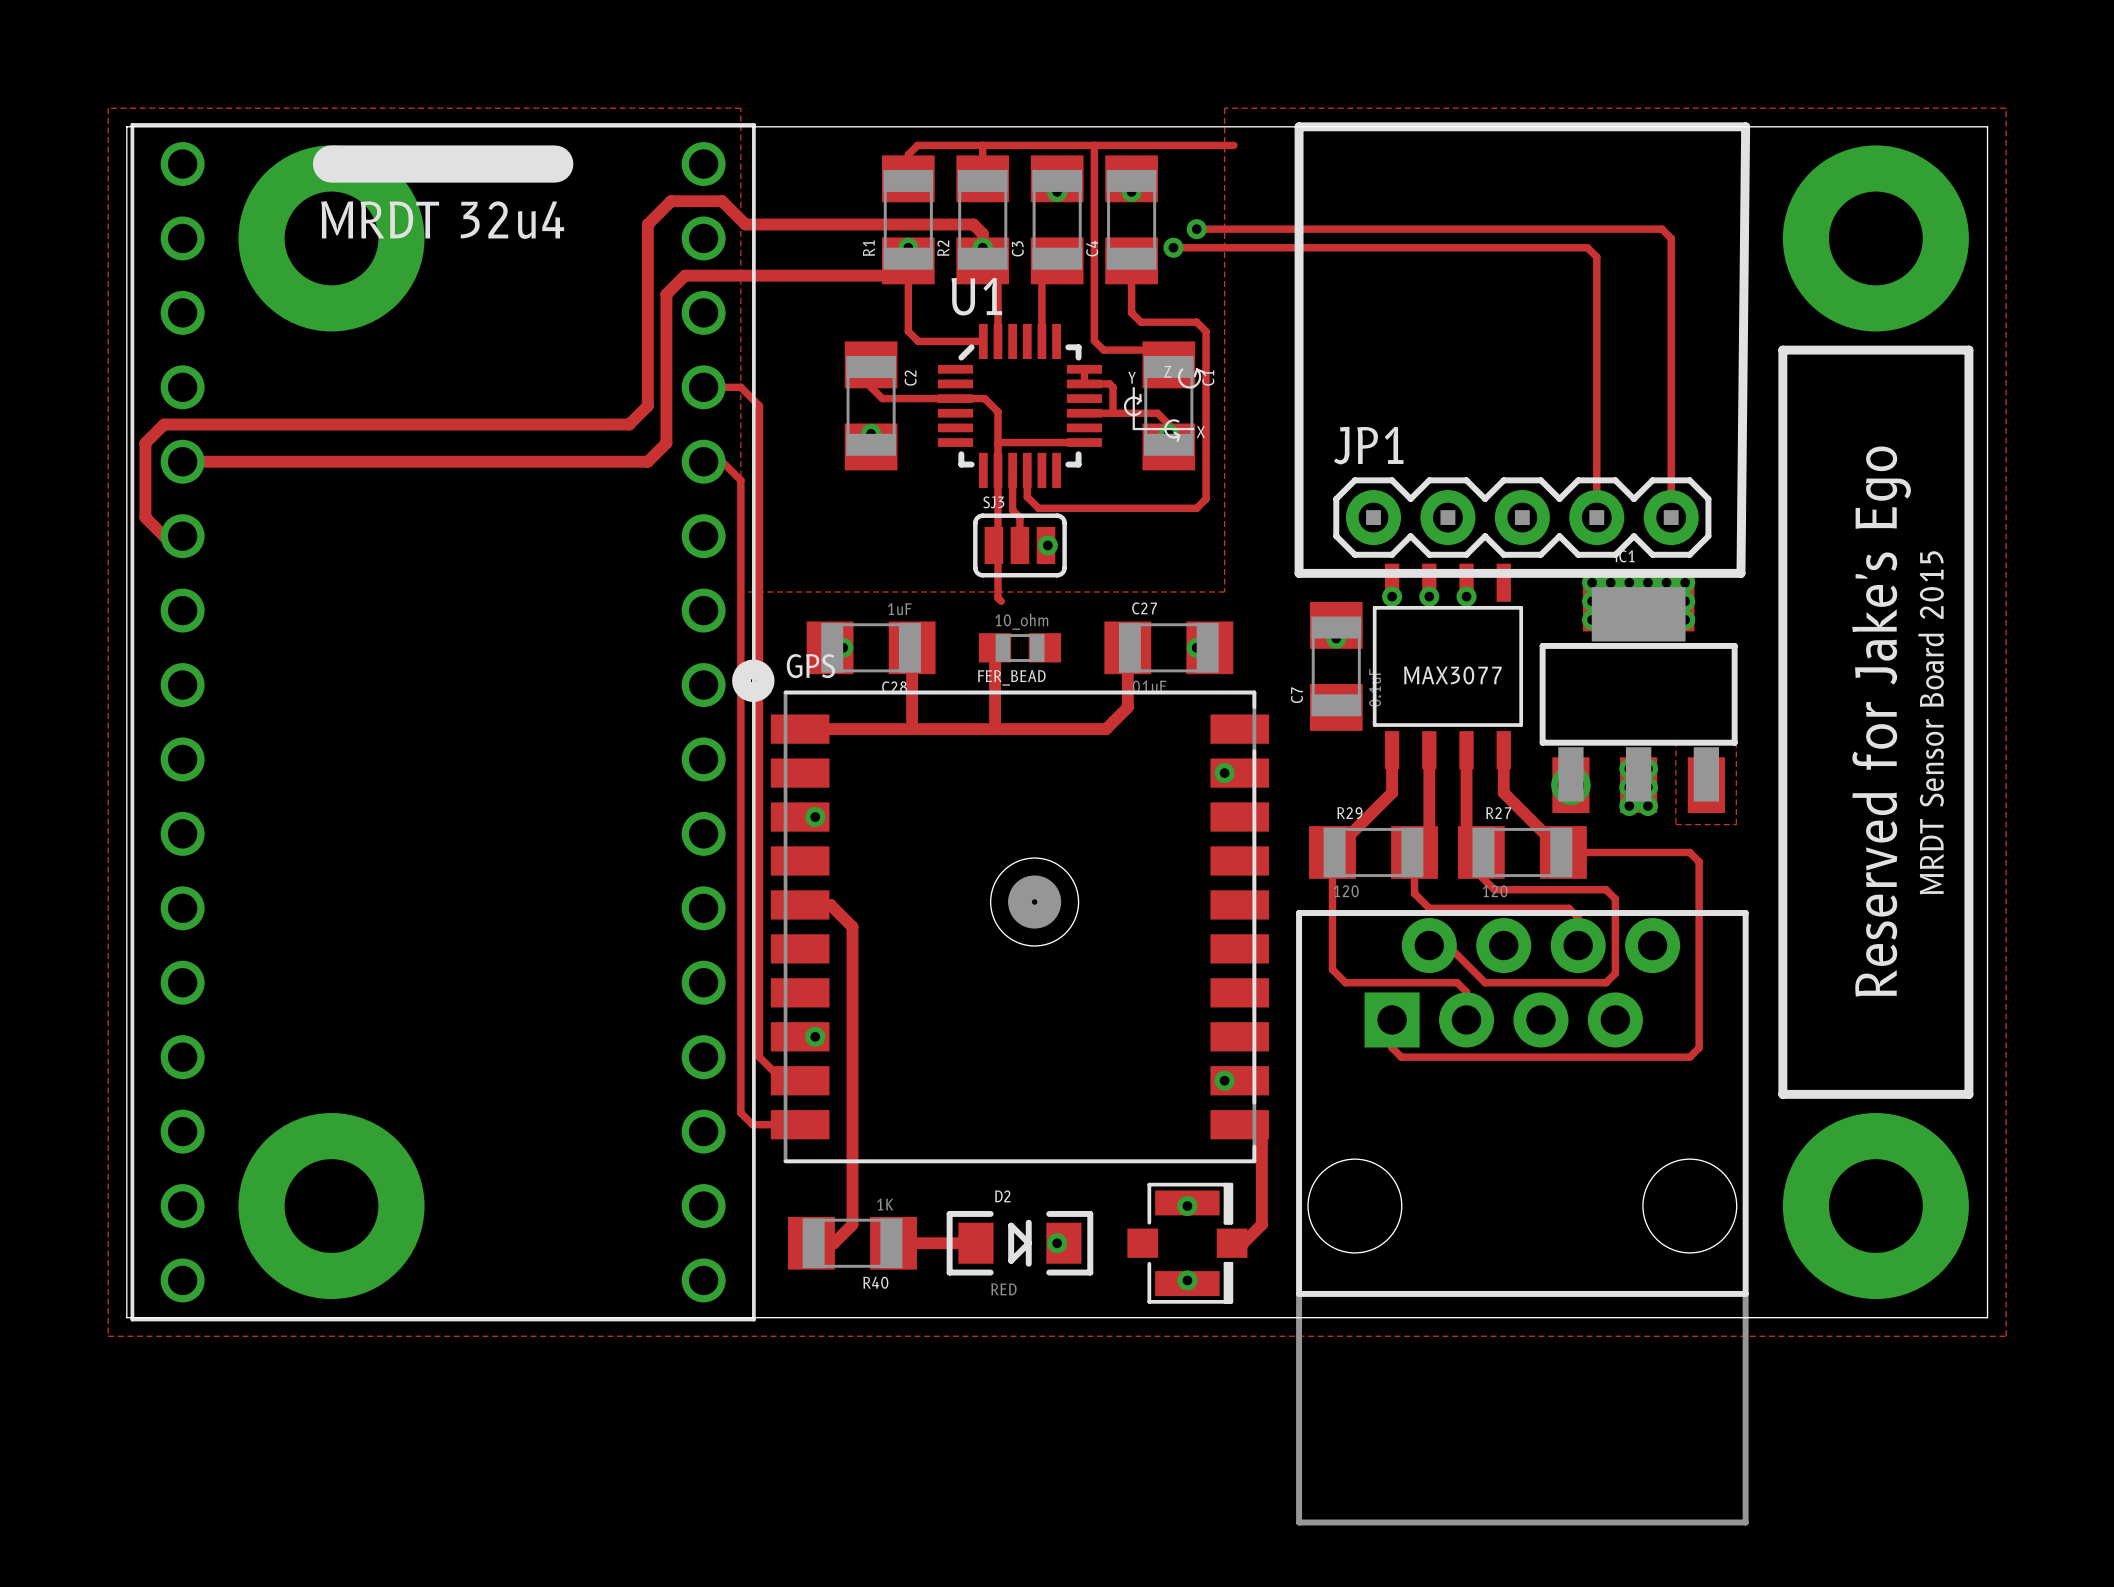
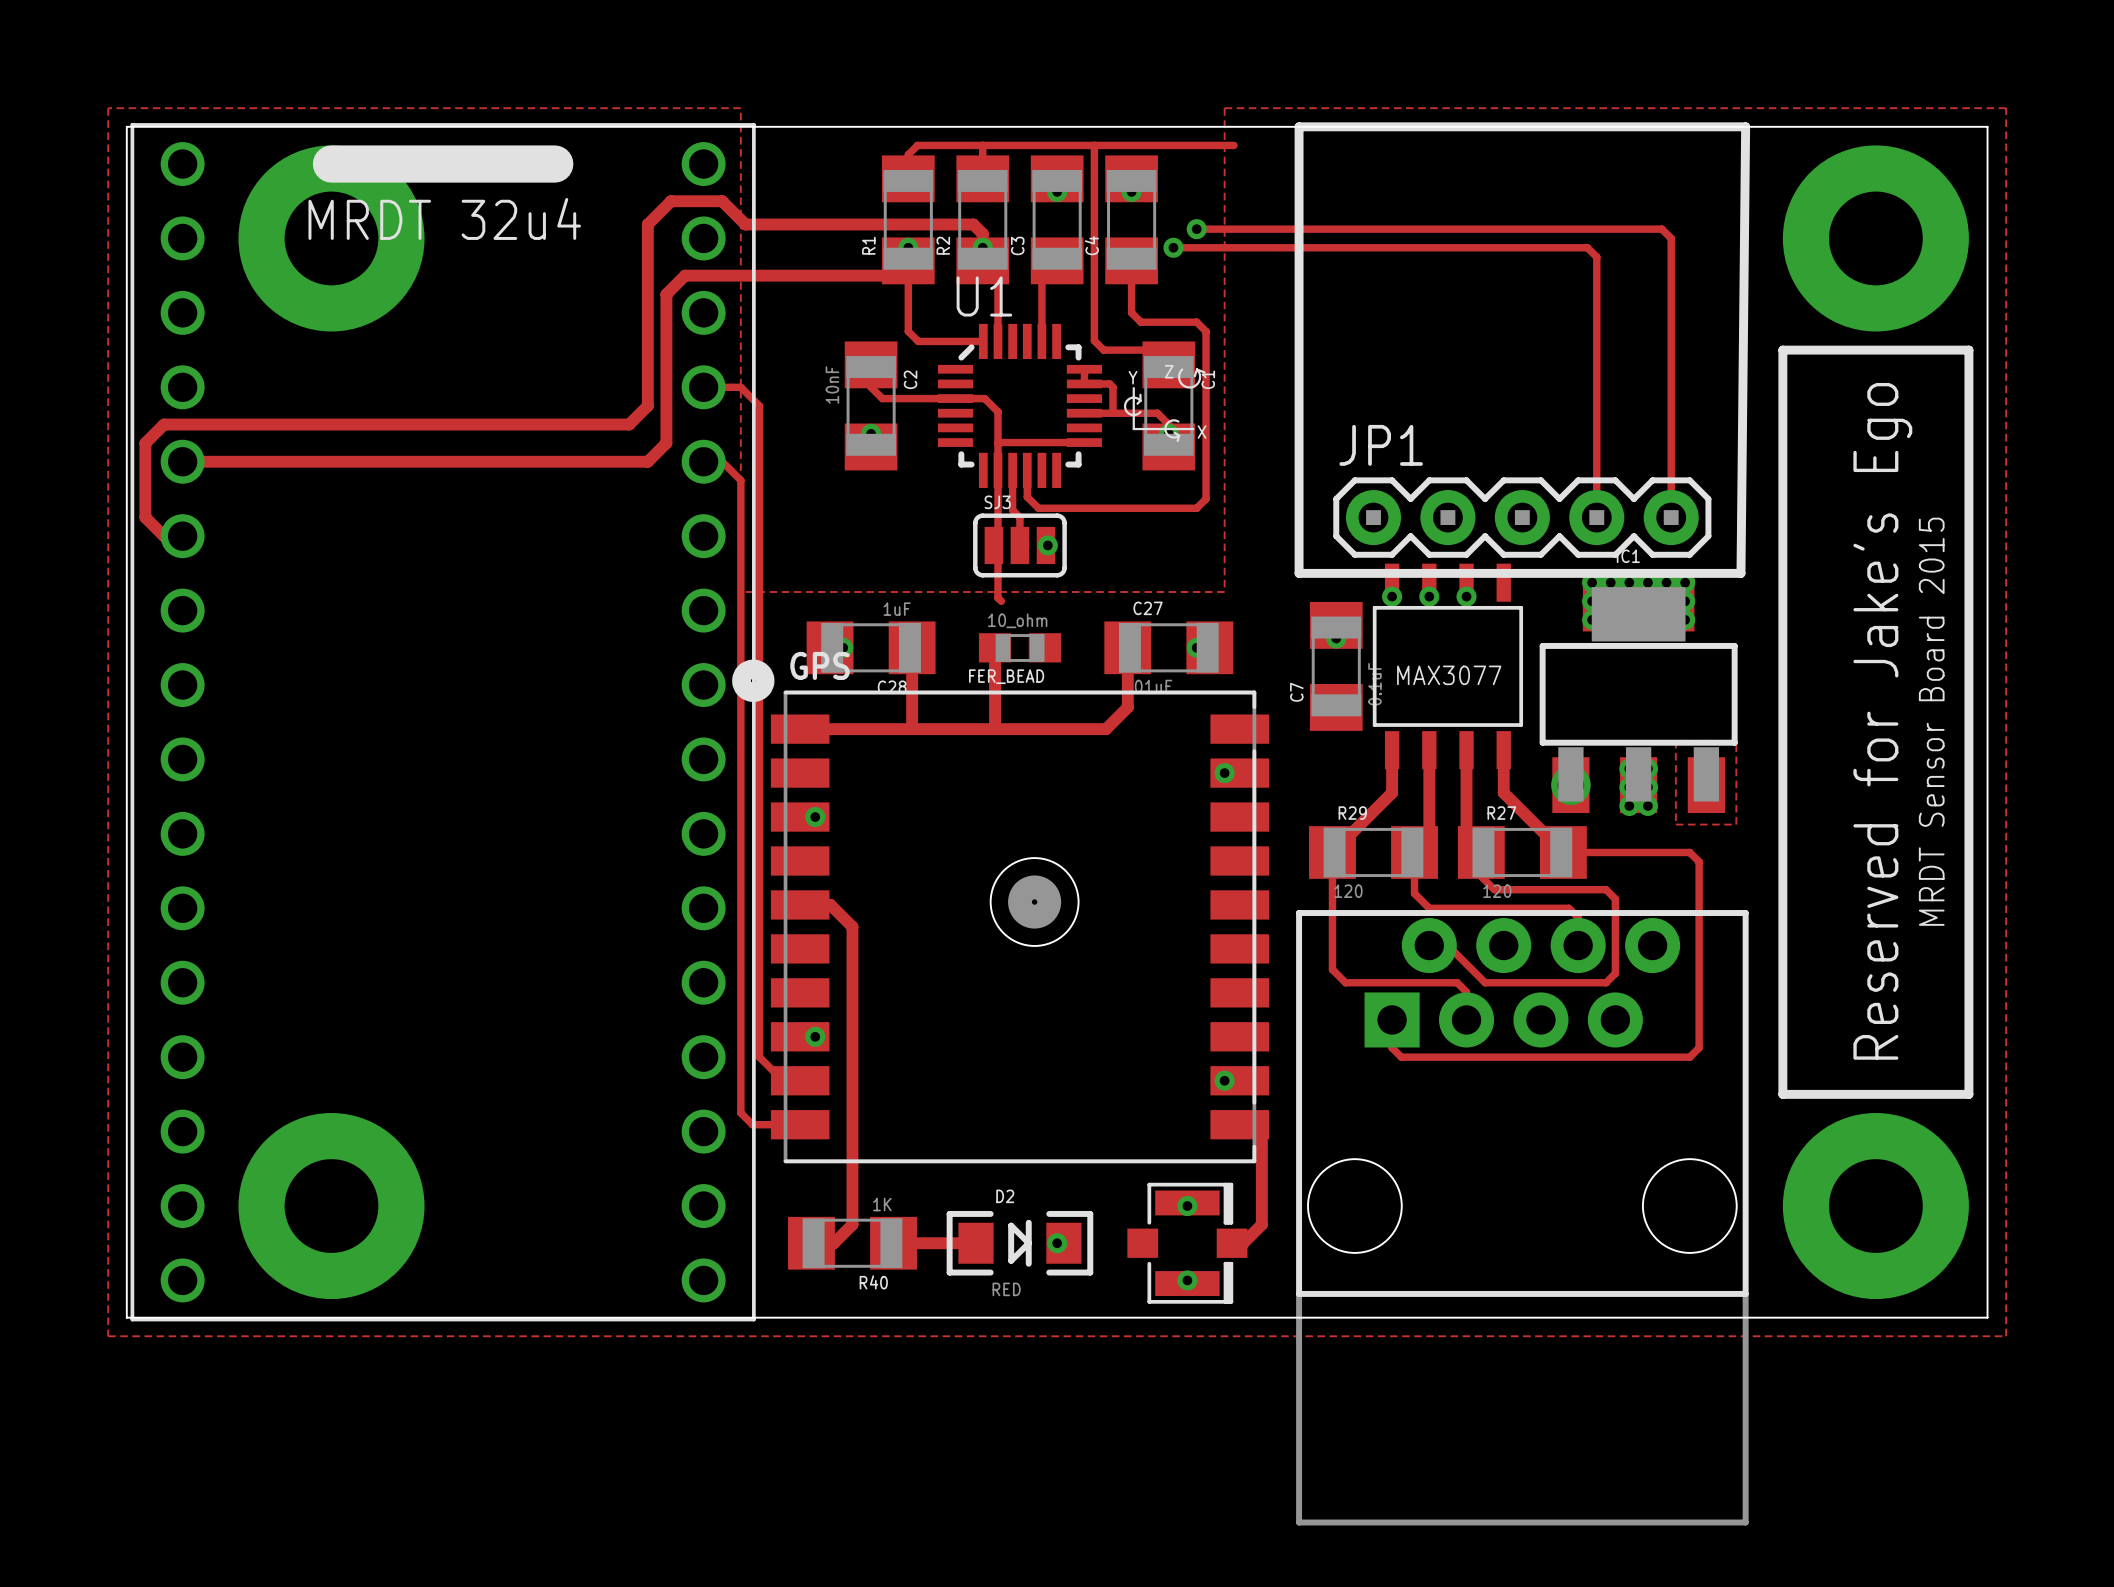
C2 value: none -> 10nF (832, 385)

